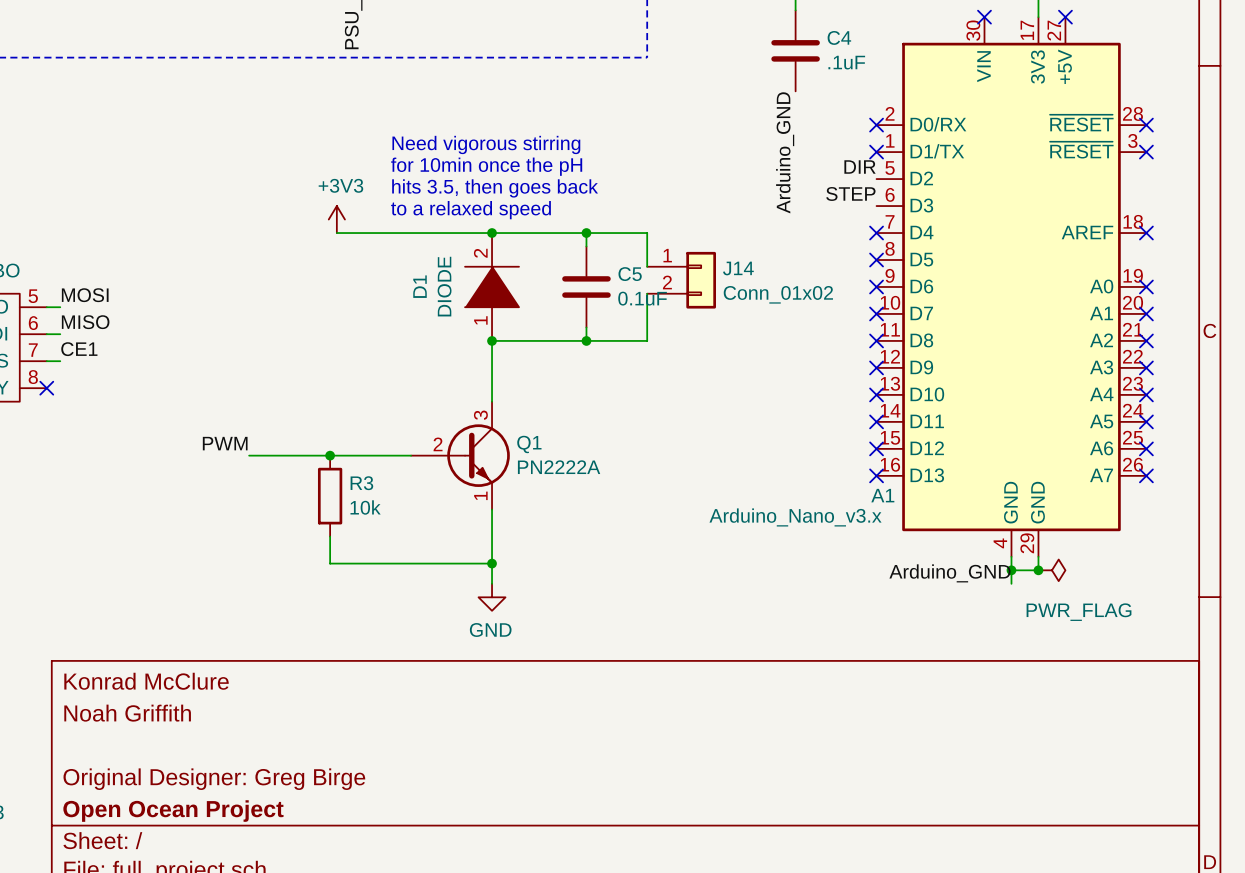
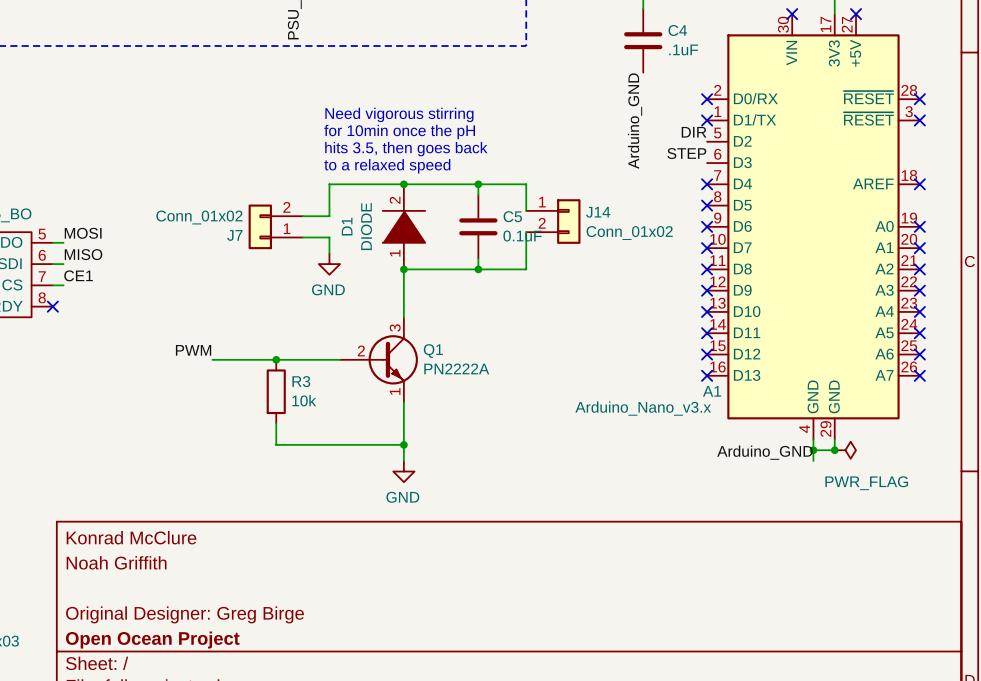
power symbol: +3V3 (336, 219) -> none
wire: (336, 233) (397, 233) -> (302, 216) (329, 216) (329, 184)
J7: none -> Conn_01x02 (275, 226)
wire: none -> (302, 237) (329, 237) (329, 253)
power symbol: none -> GND (329, 264)

